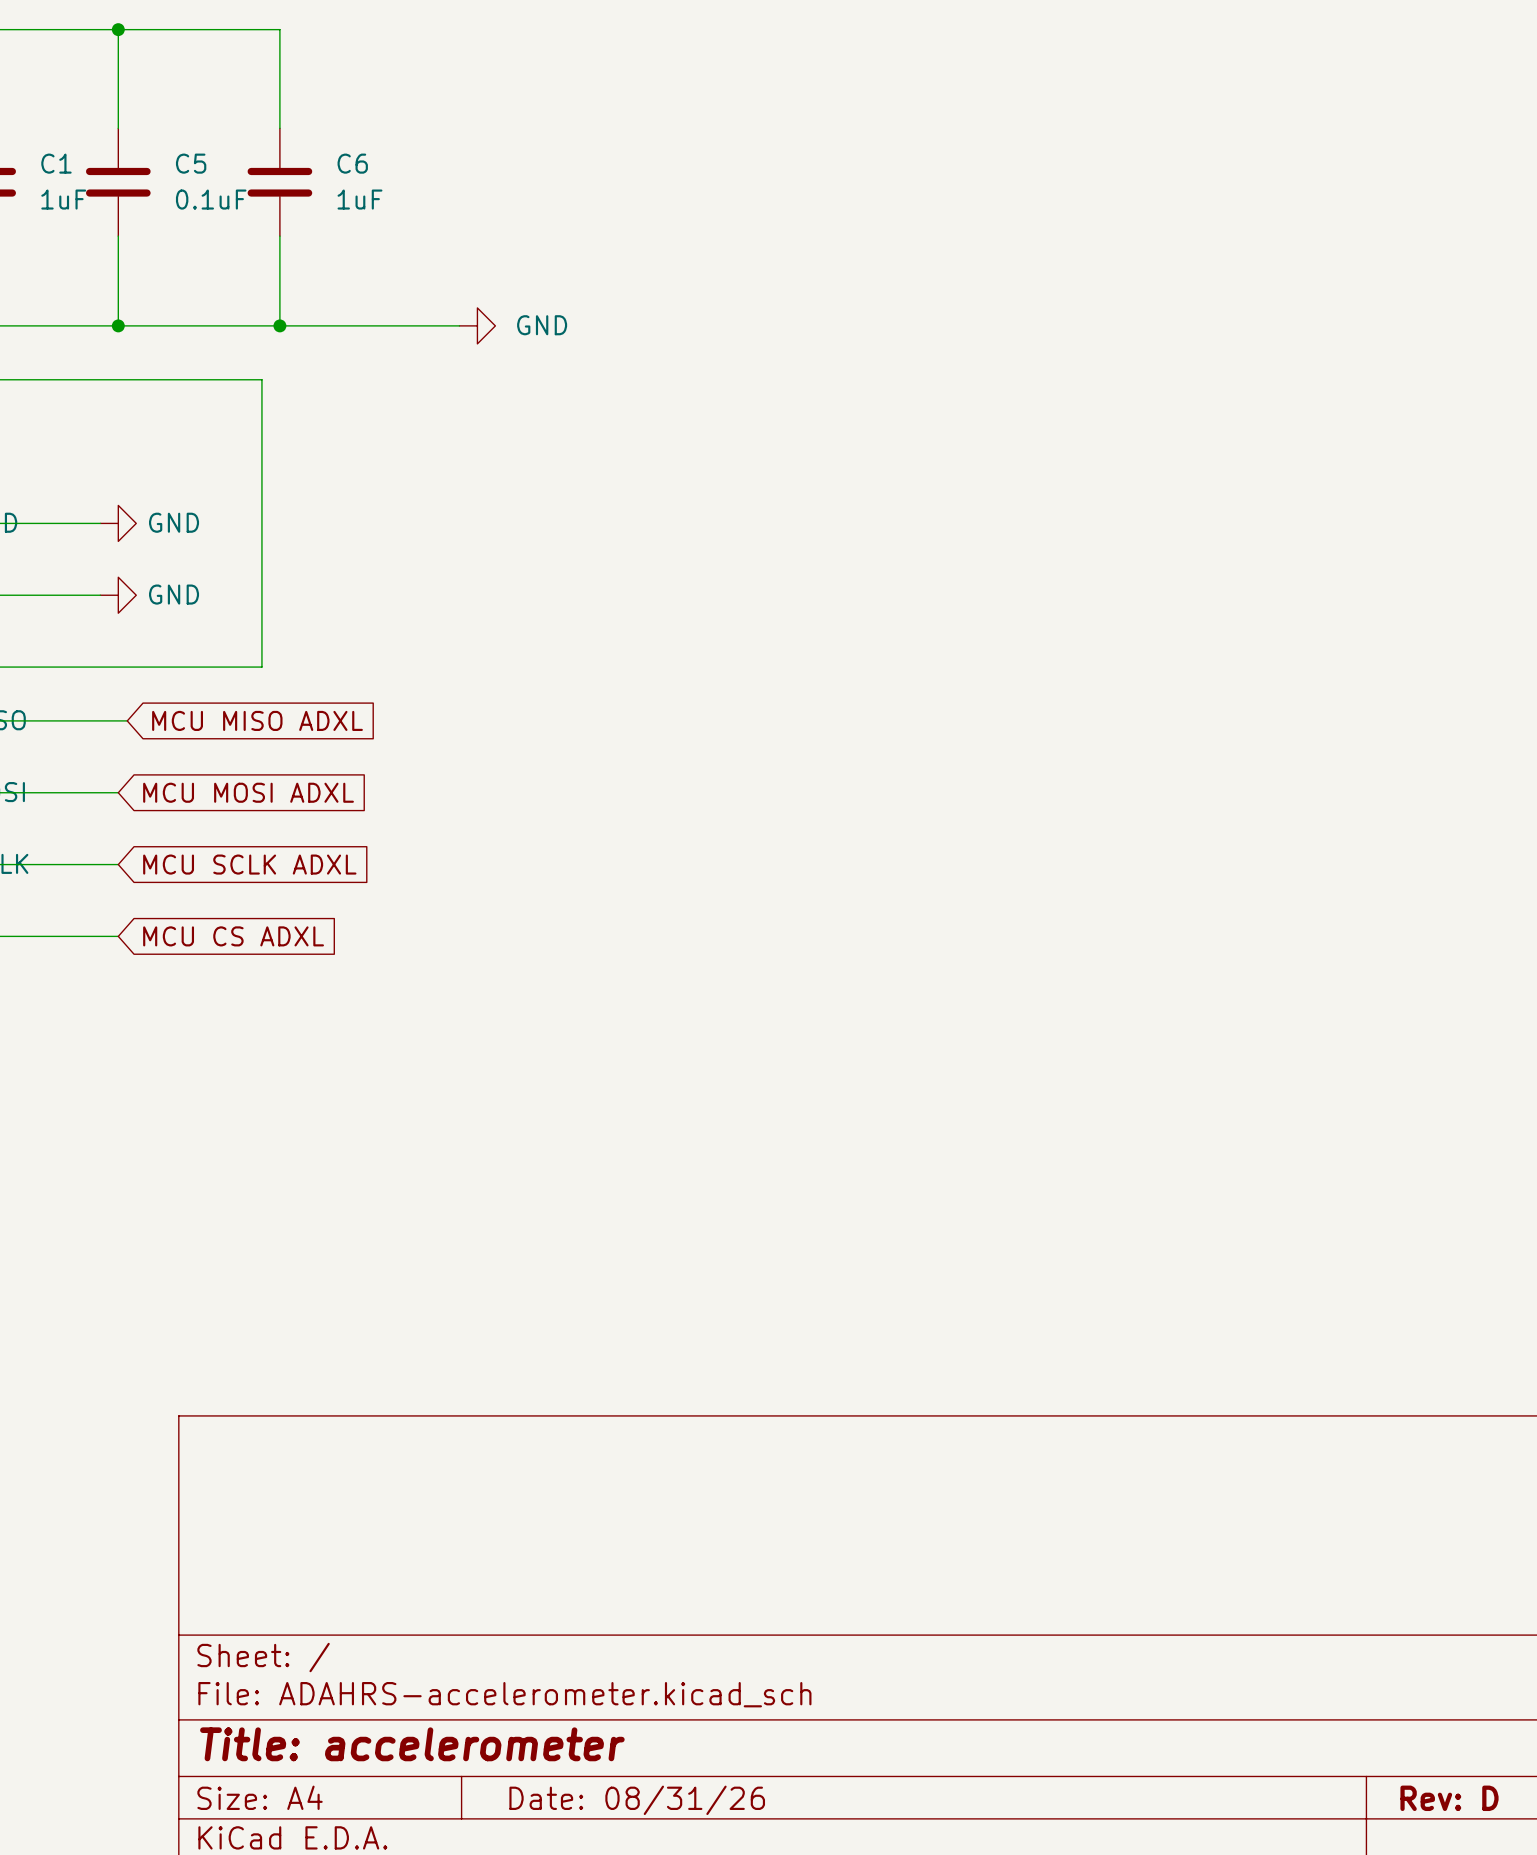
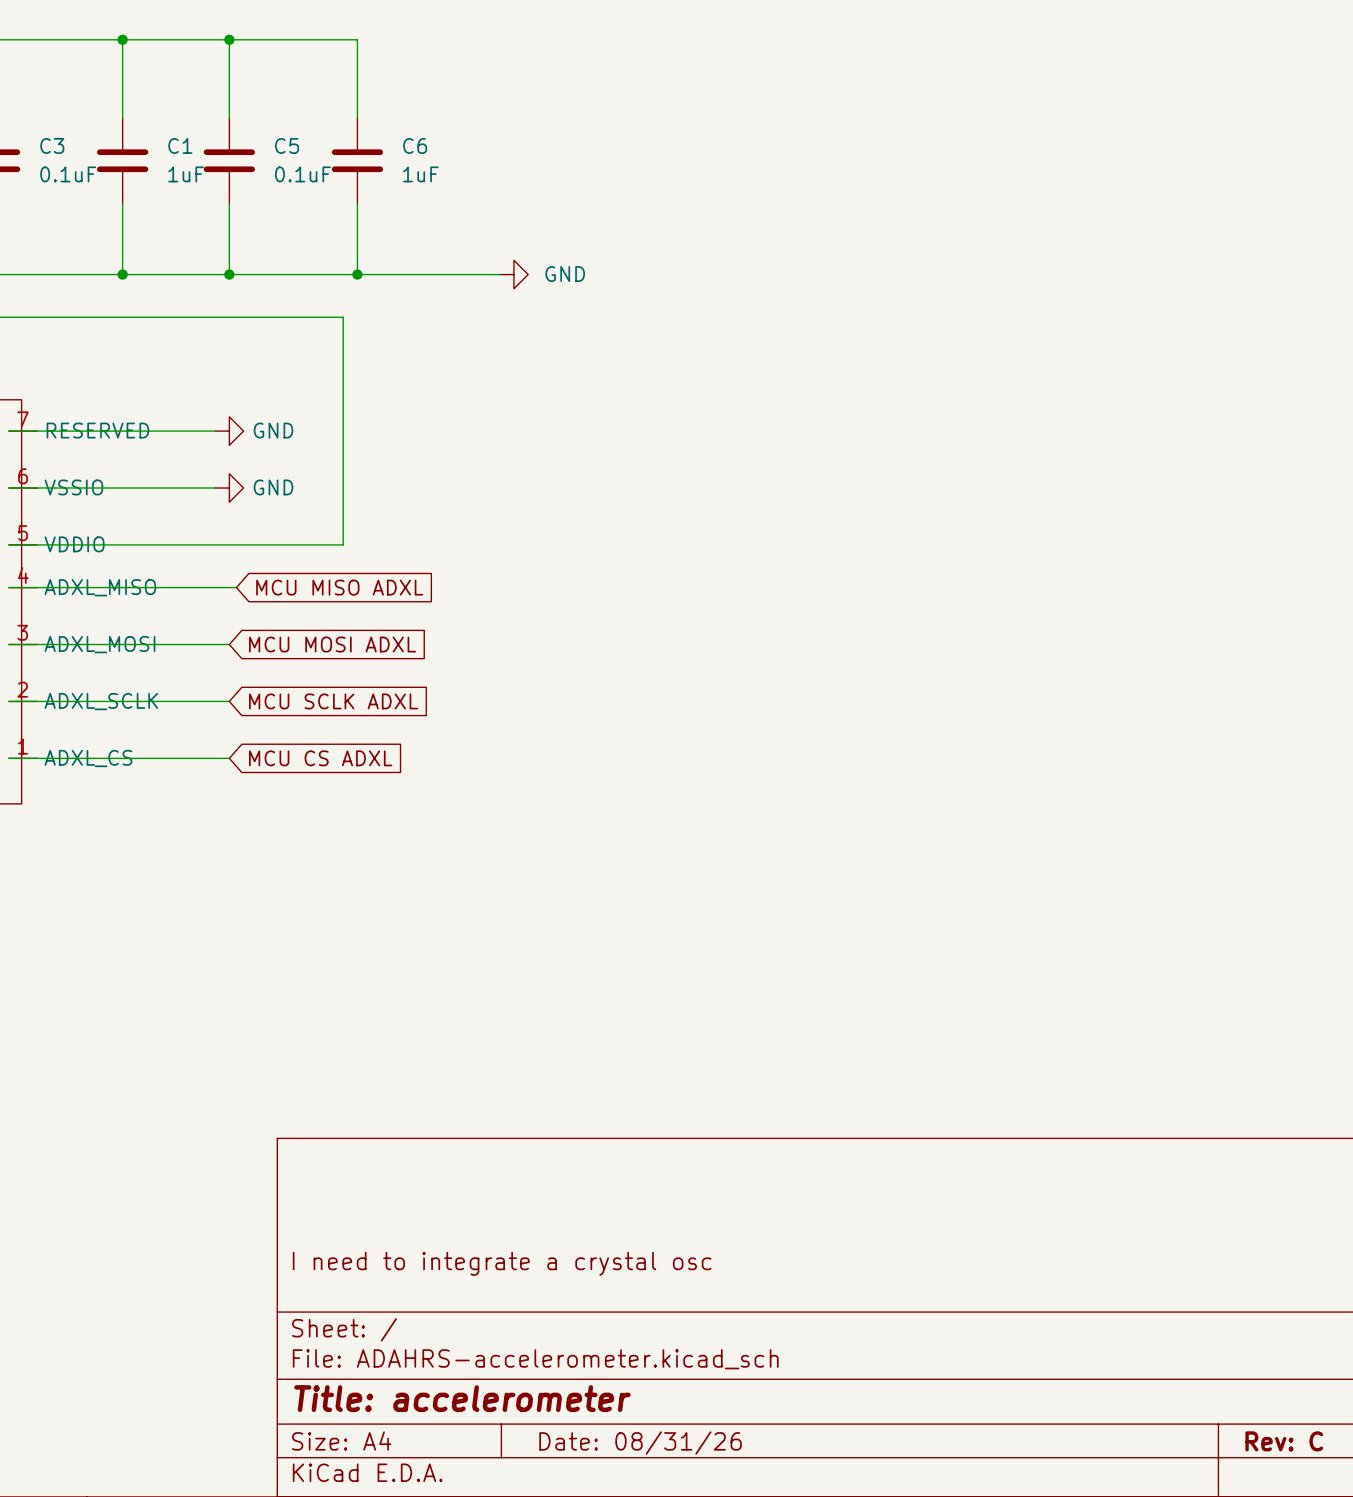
title block: none -> I need to integrate a crystal osc (502, 1263)
title block: Rev: D (1449, 1798) -> Rev: C (1284, 1441)

